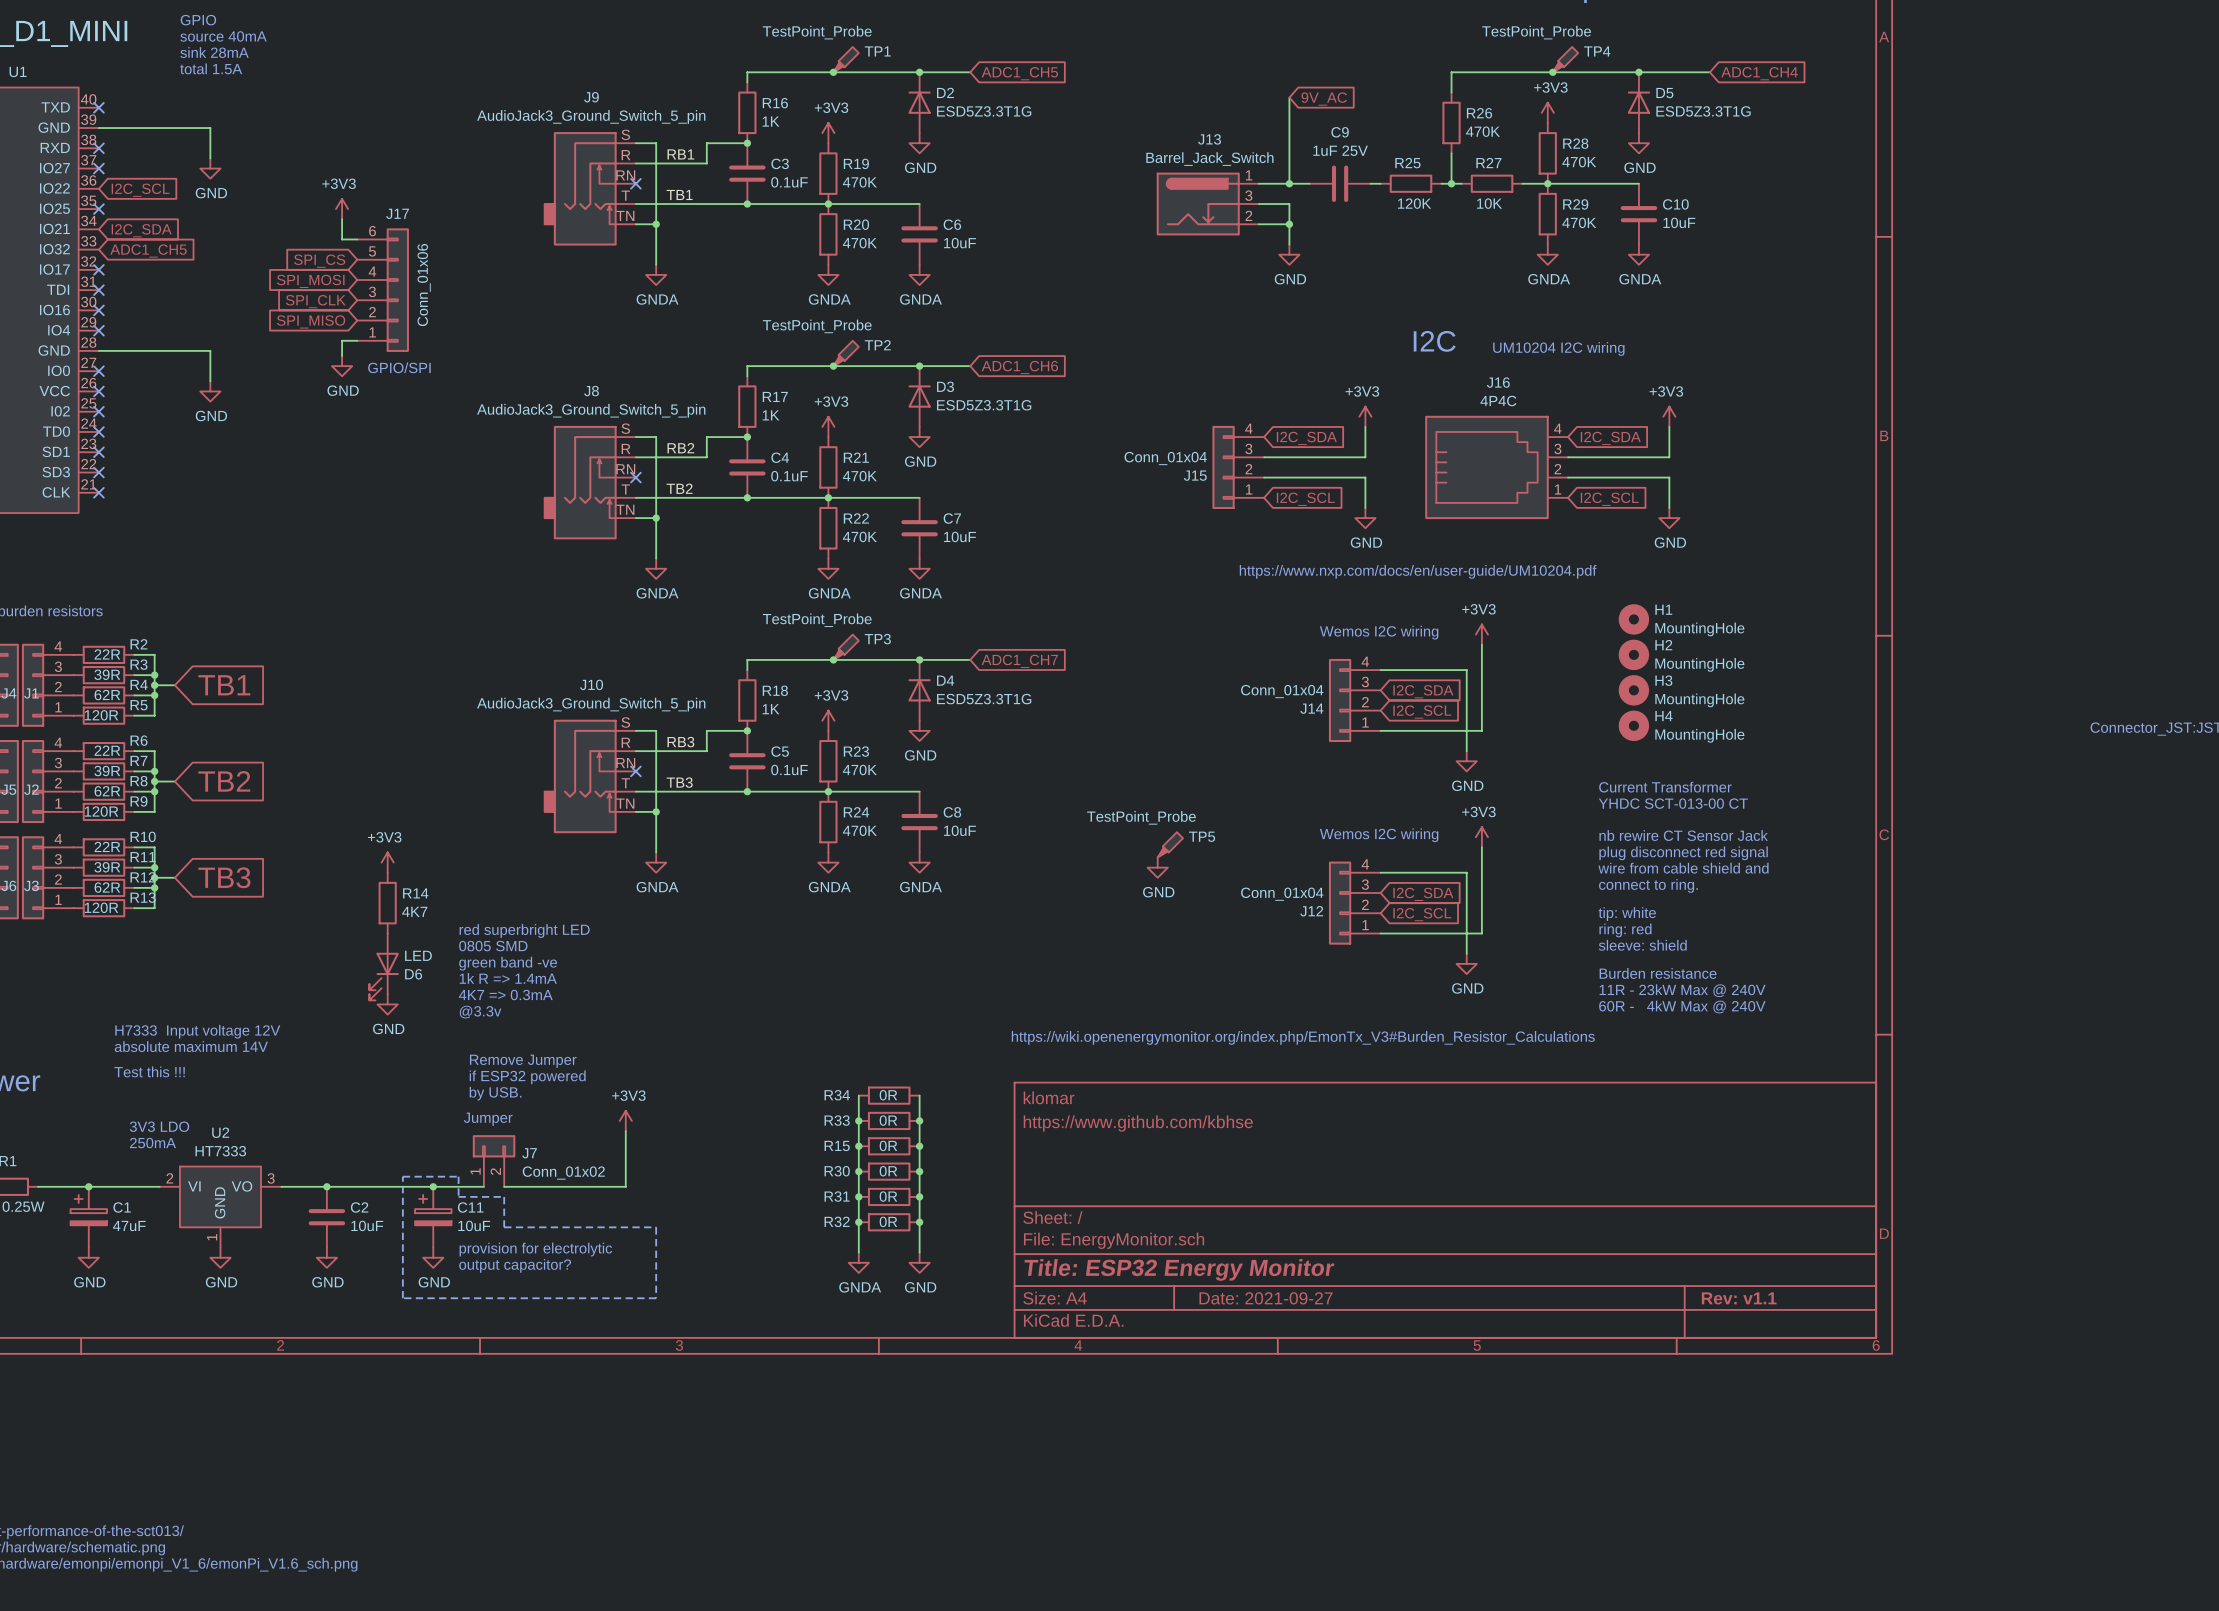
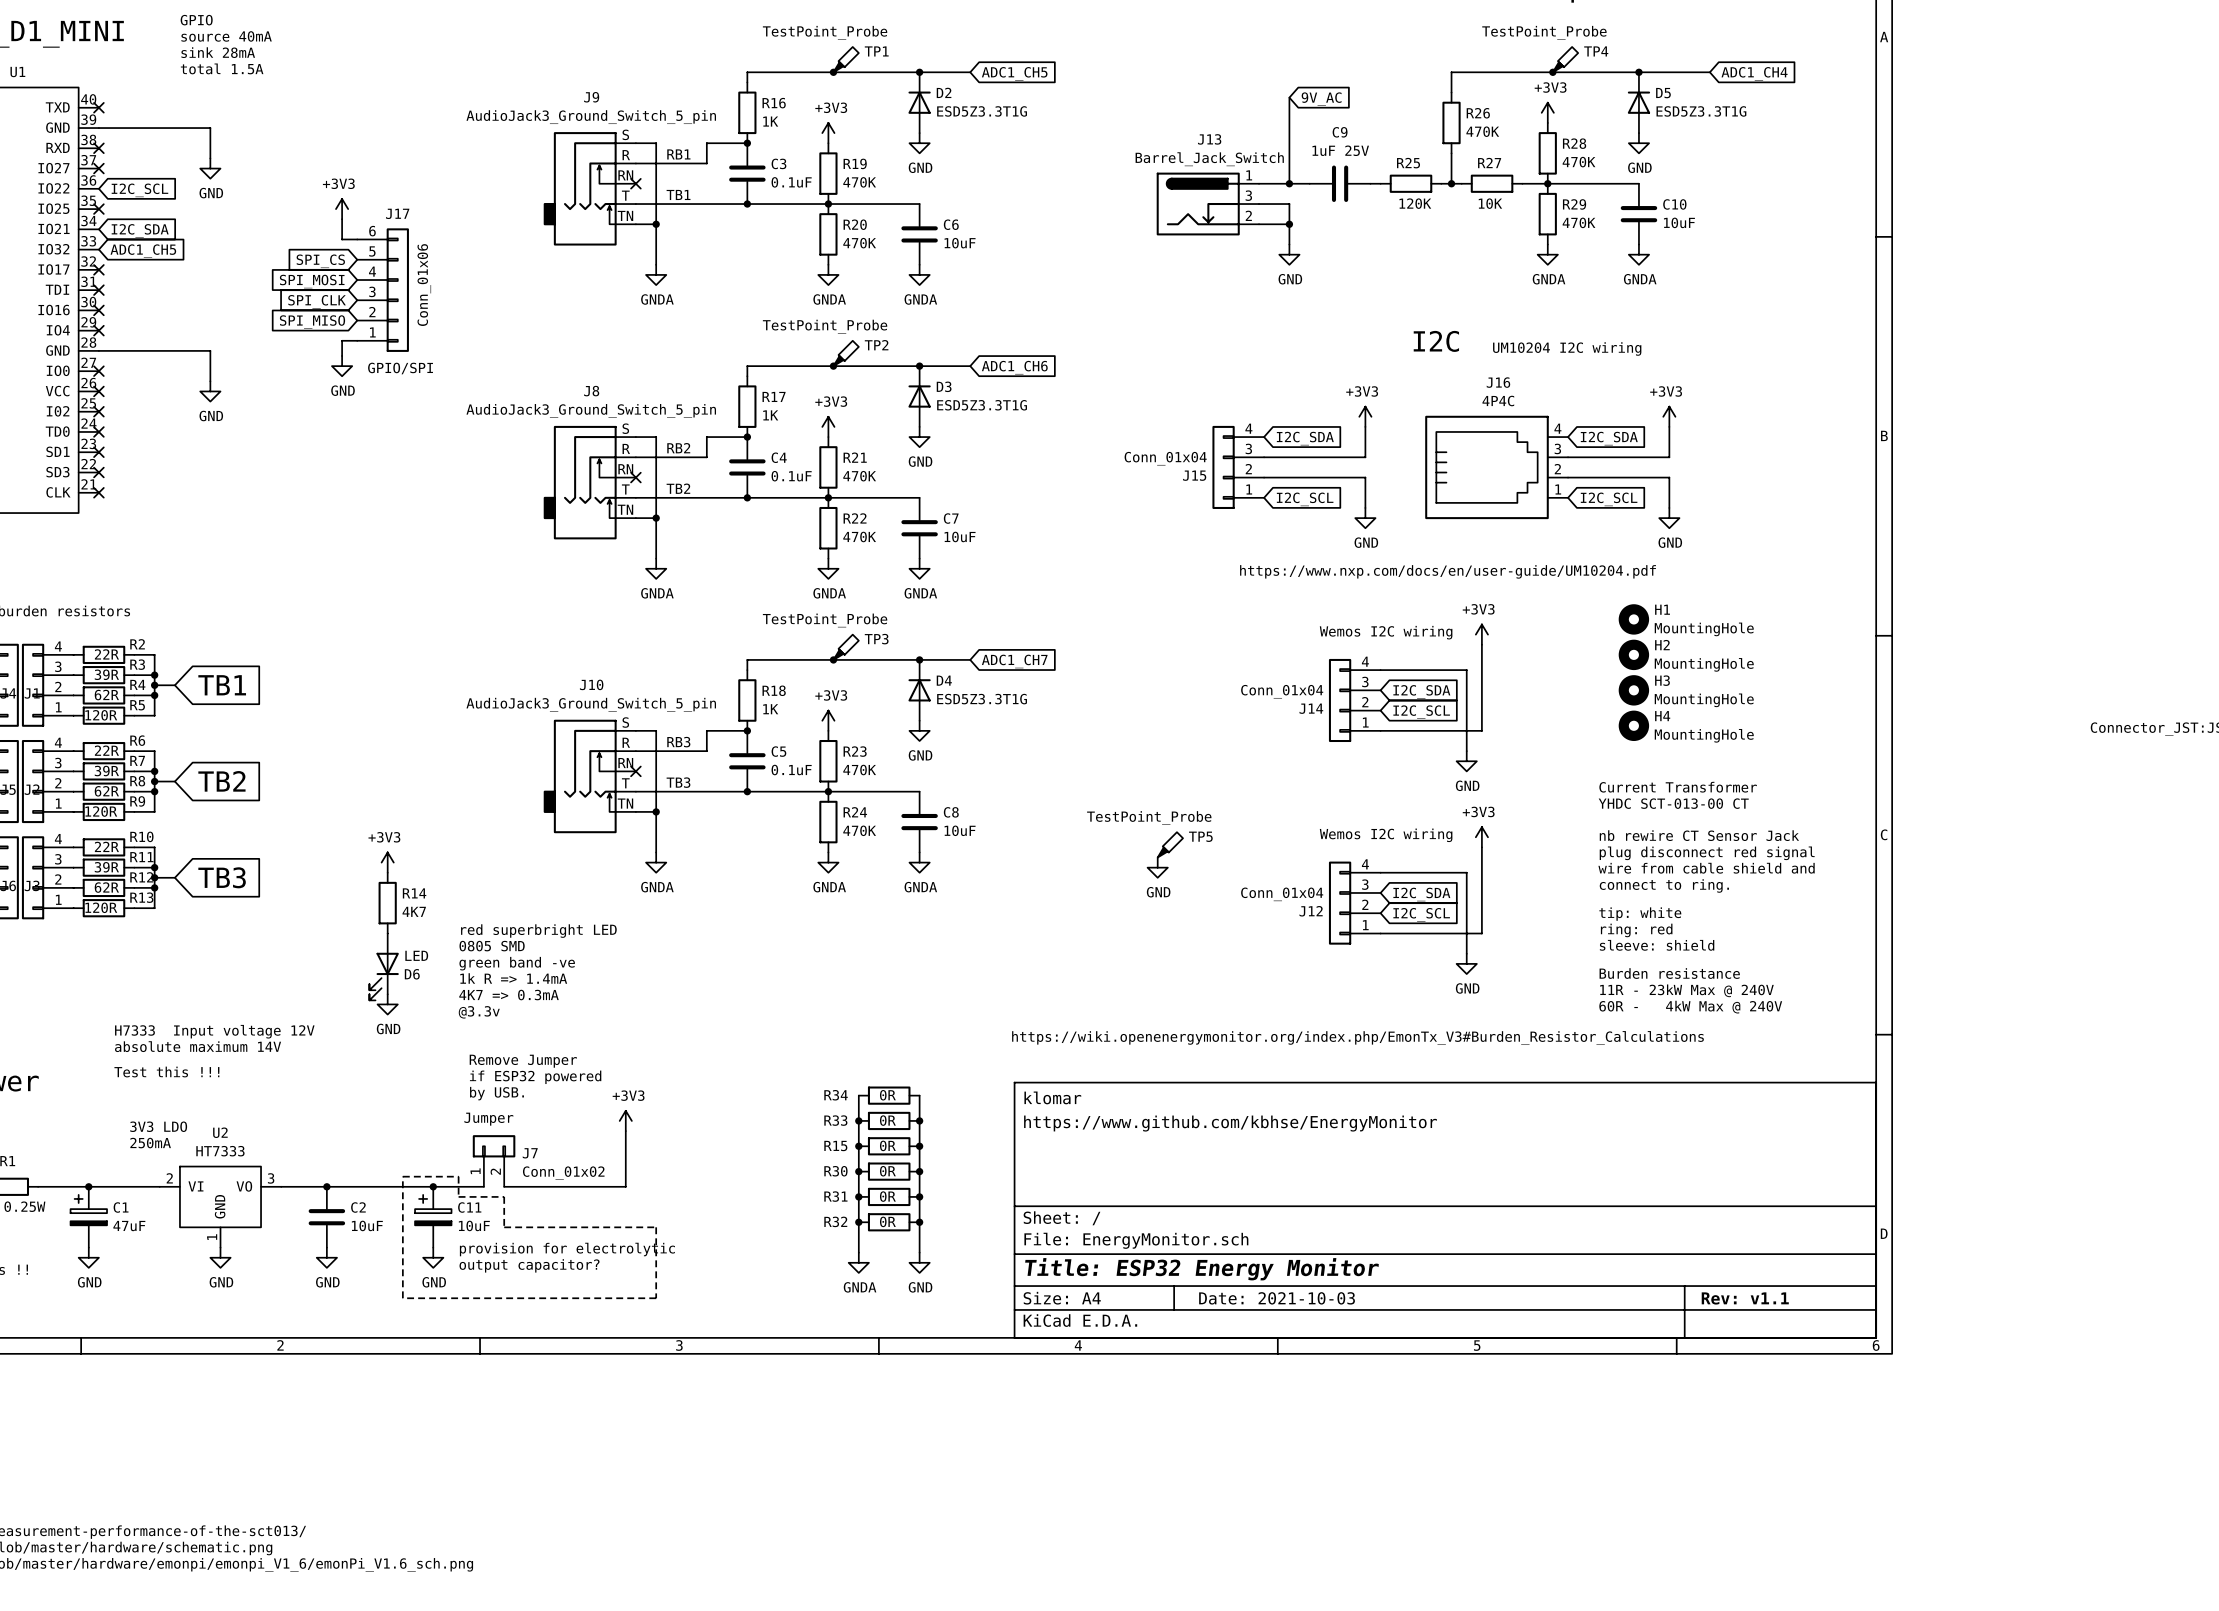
title block: https://www.github.com/kbhse (1138, 1123) -> https://www.github.com/kbhse/EnergyMonitor (1230, 1123)
title block: Date: 2021-09-27 (1266, 1298) -> Date: 2021-10-03 (1277, 1298)

